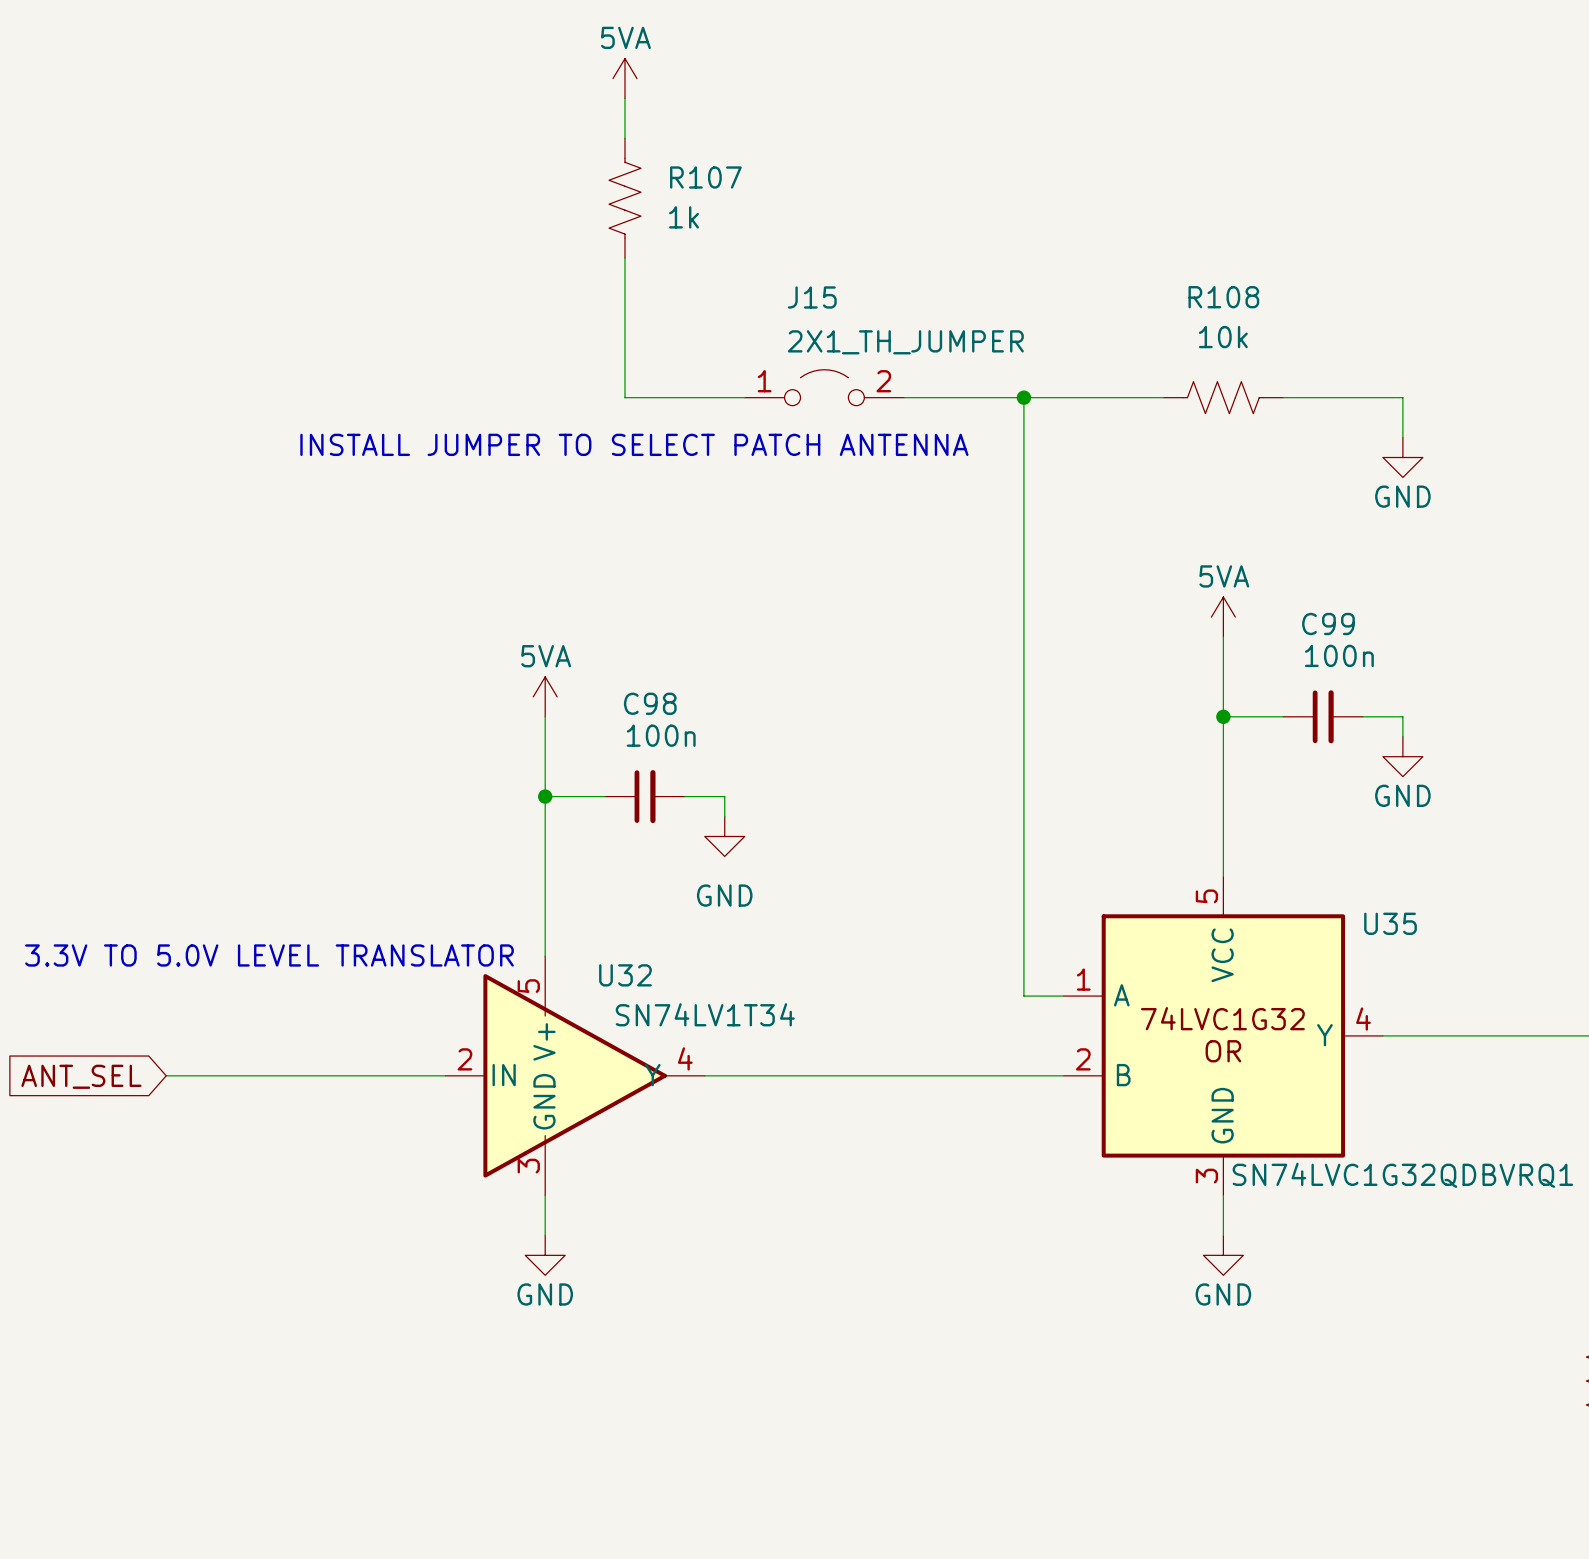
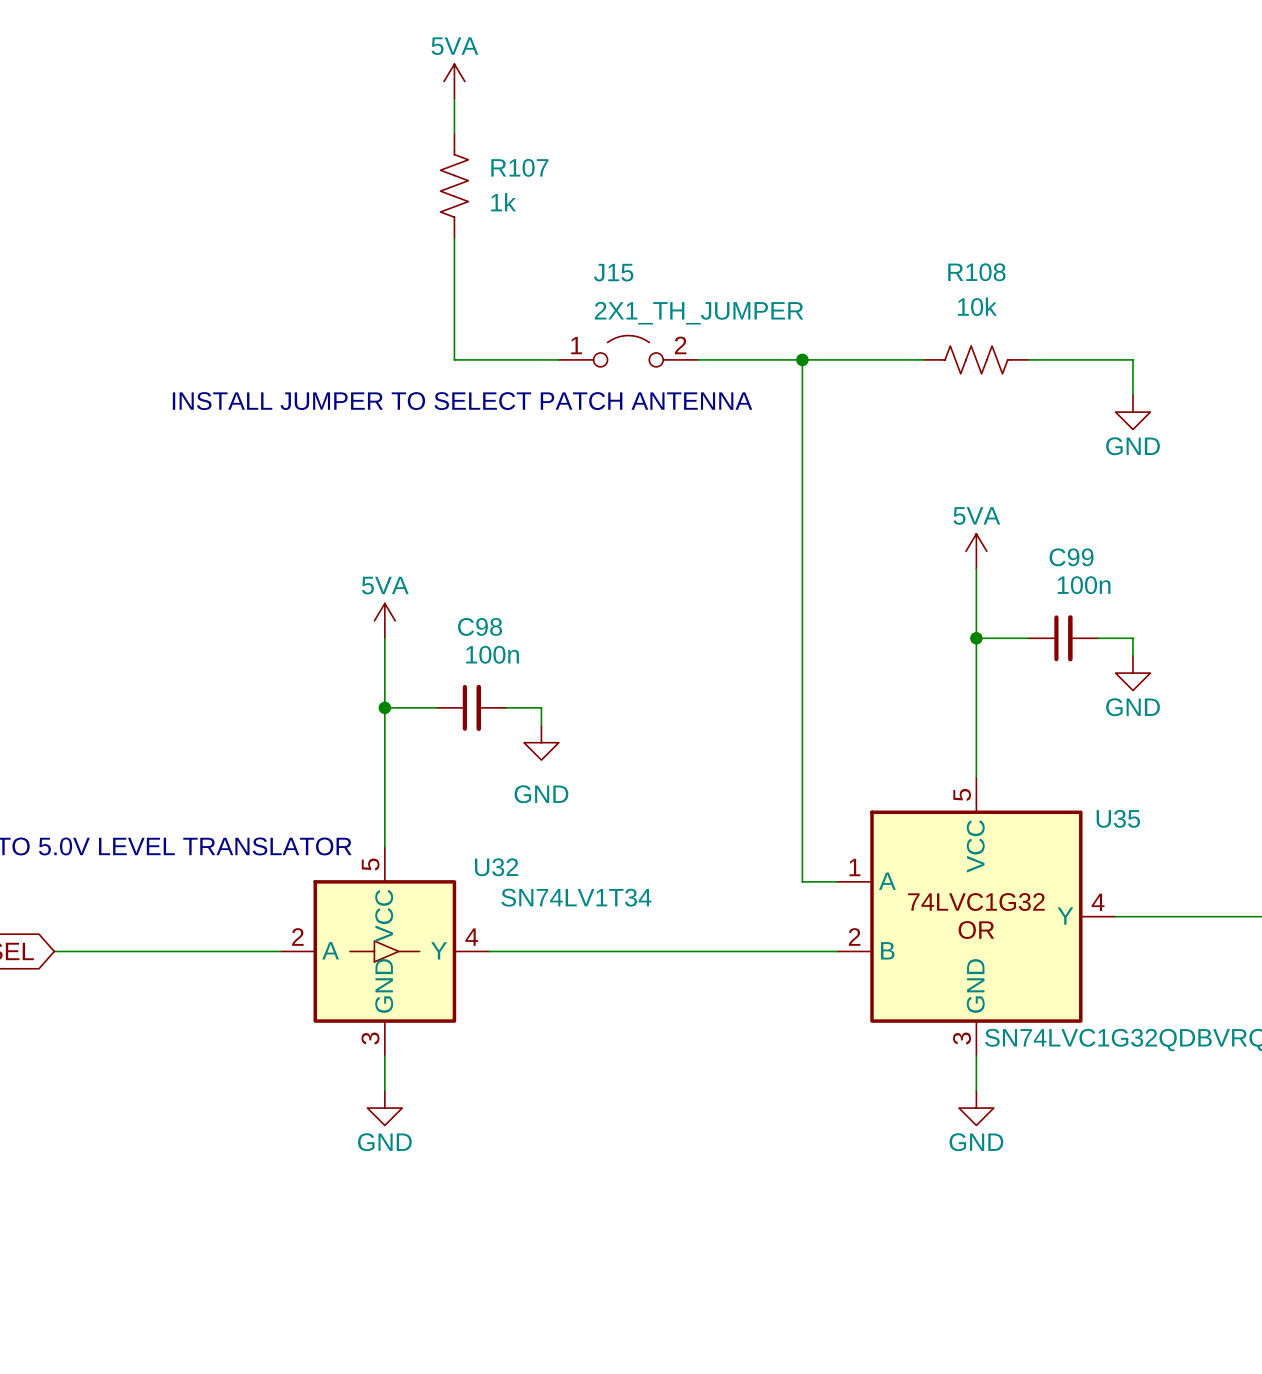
U32 symbol: [445, 956, 705, 1196] -> [280, 847, 490, 1056]
U32 name position: U32 (625, 975) -> U32 (496, 867)
U32 value position: SN74LV1T34 (705, 1014) -> SN74LV1T34 (576, 897)

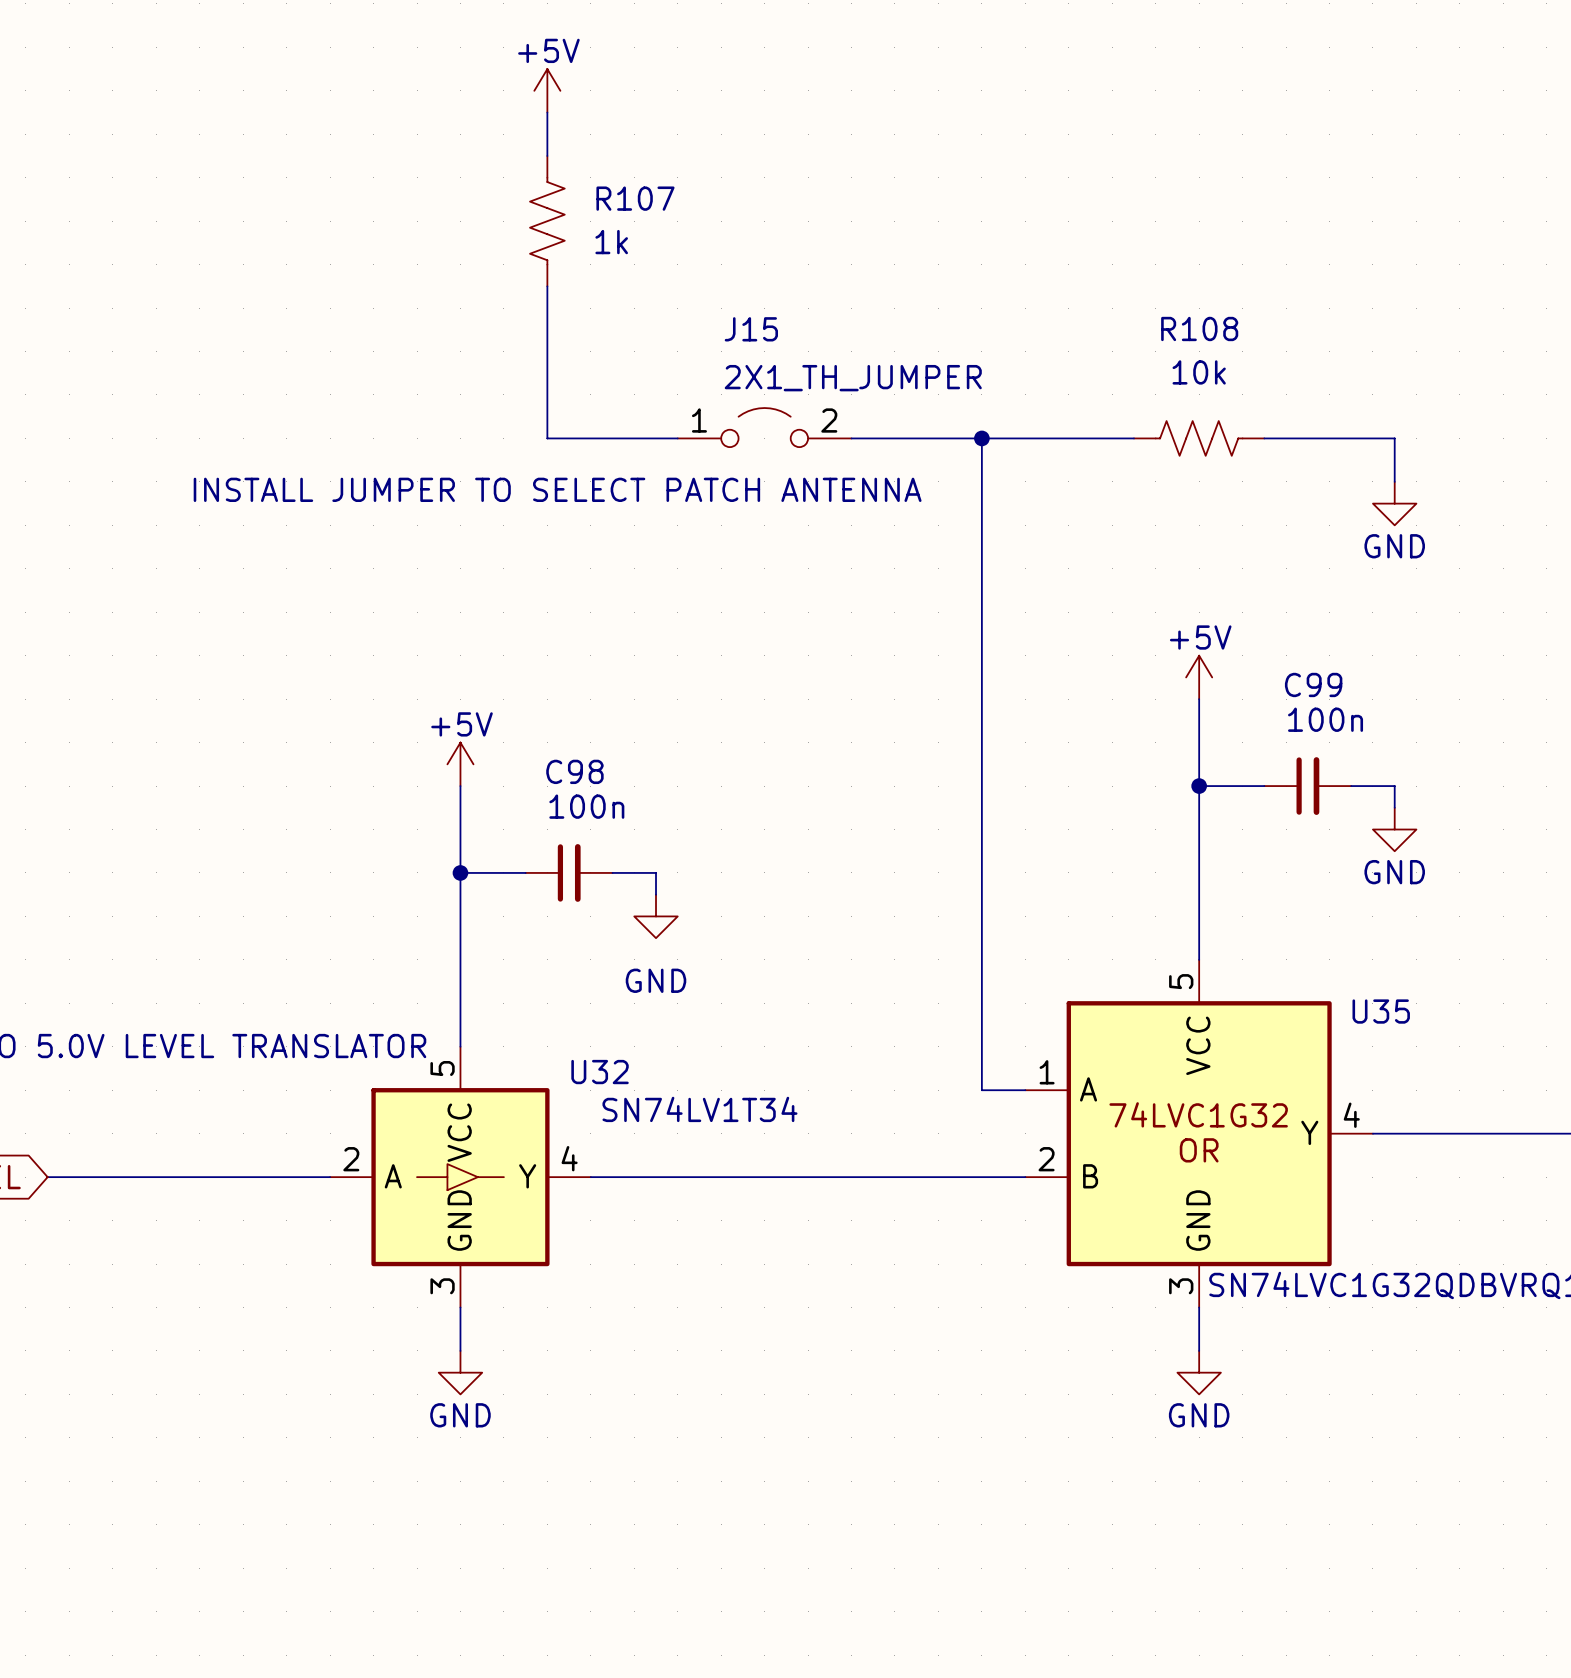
power symbol: 5VA (454, 81) -> +5V (547, 90)
power symbol: 5VA (976, 551) -> +5V (1199, 677)
power symbol: 5VA (384, 620) -> +5V (460, 764)

